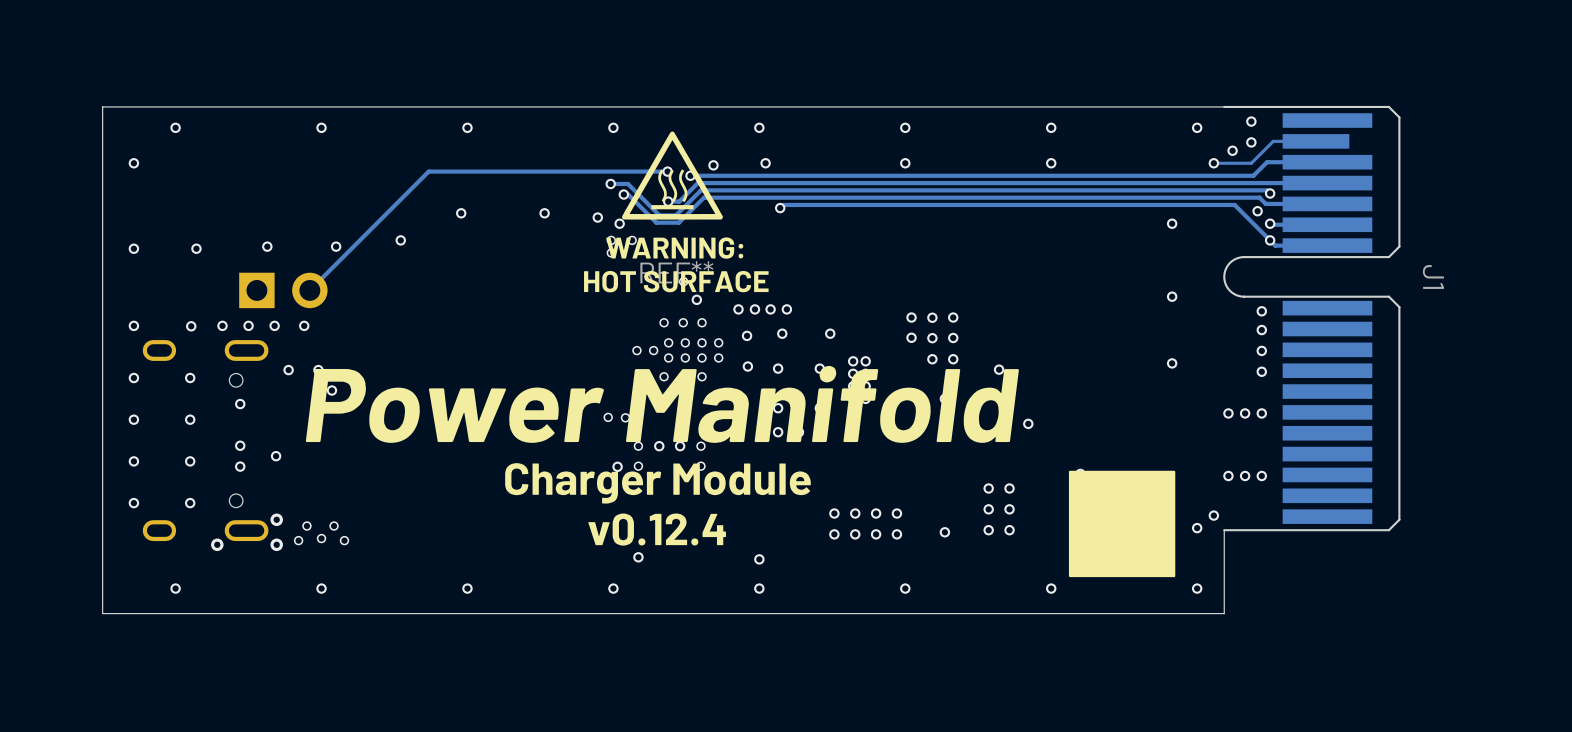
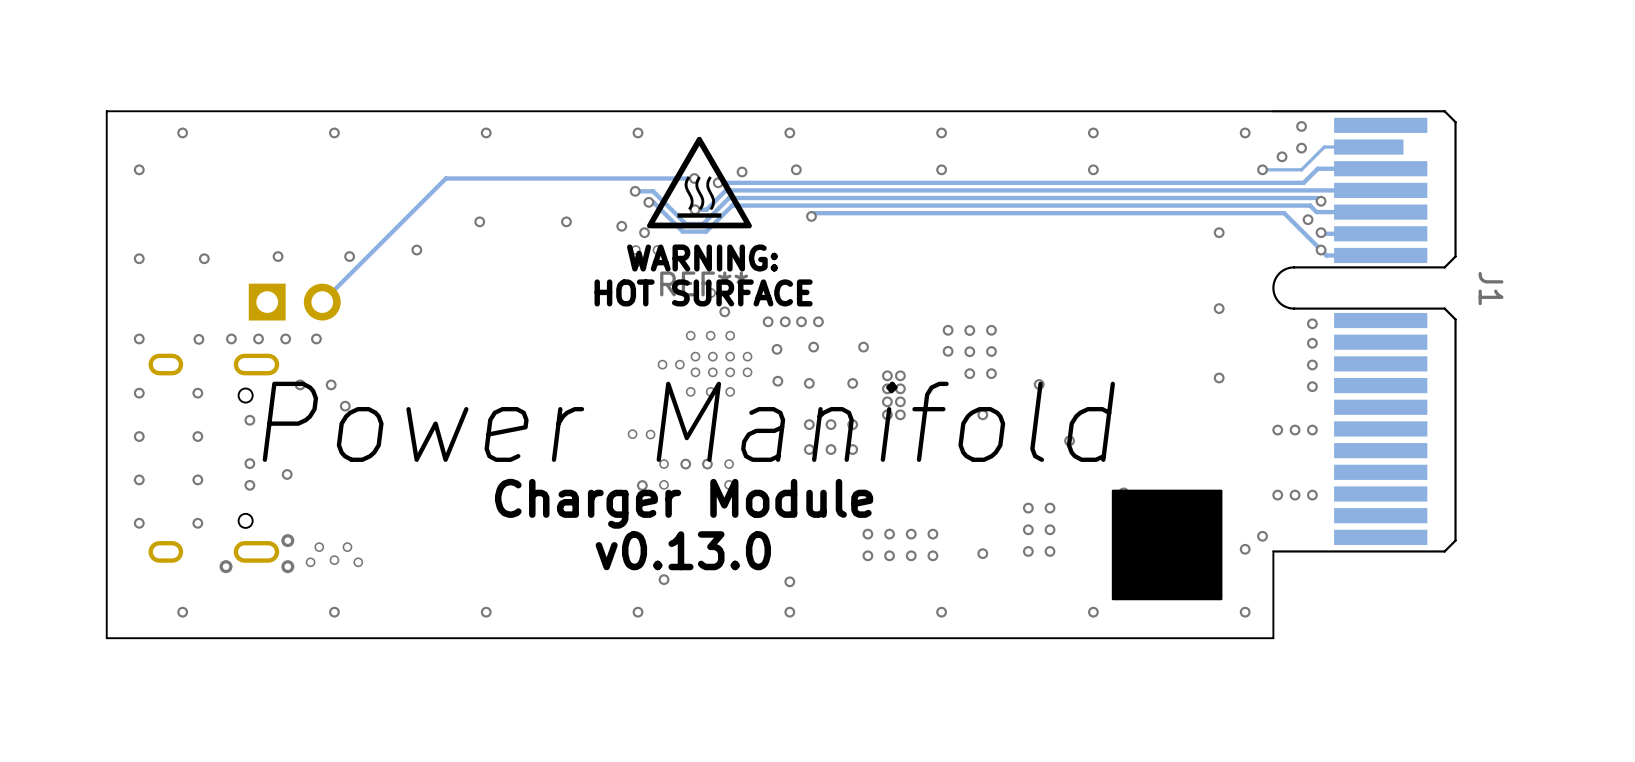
text: v0.12.4 (657, 529) -> v0.13.0 (683, 550)

